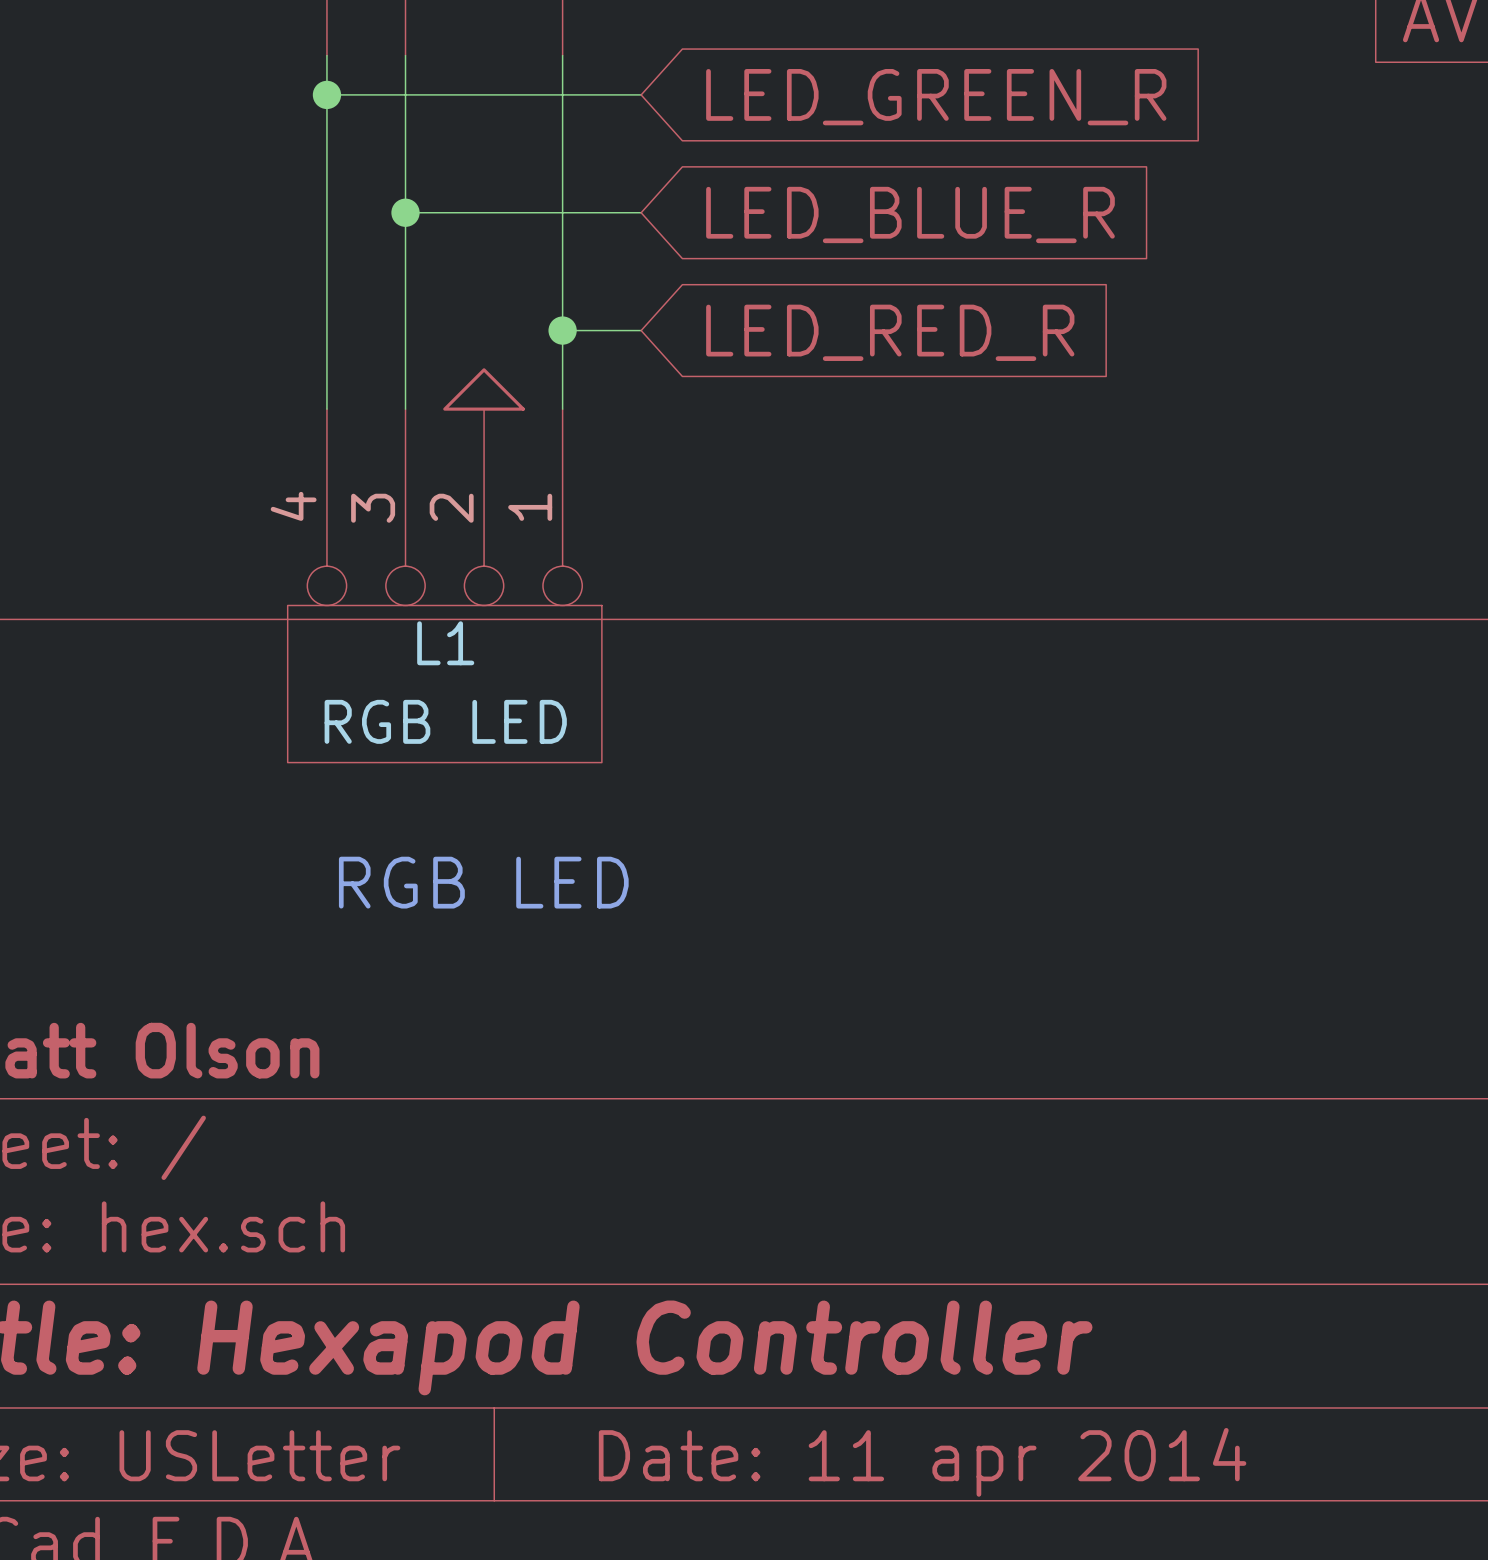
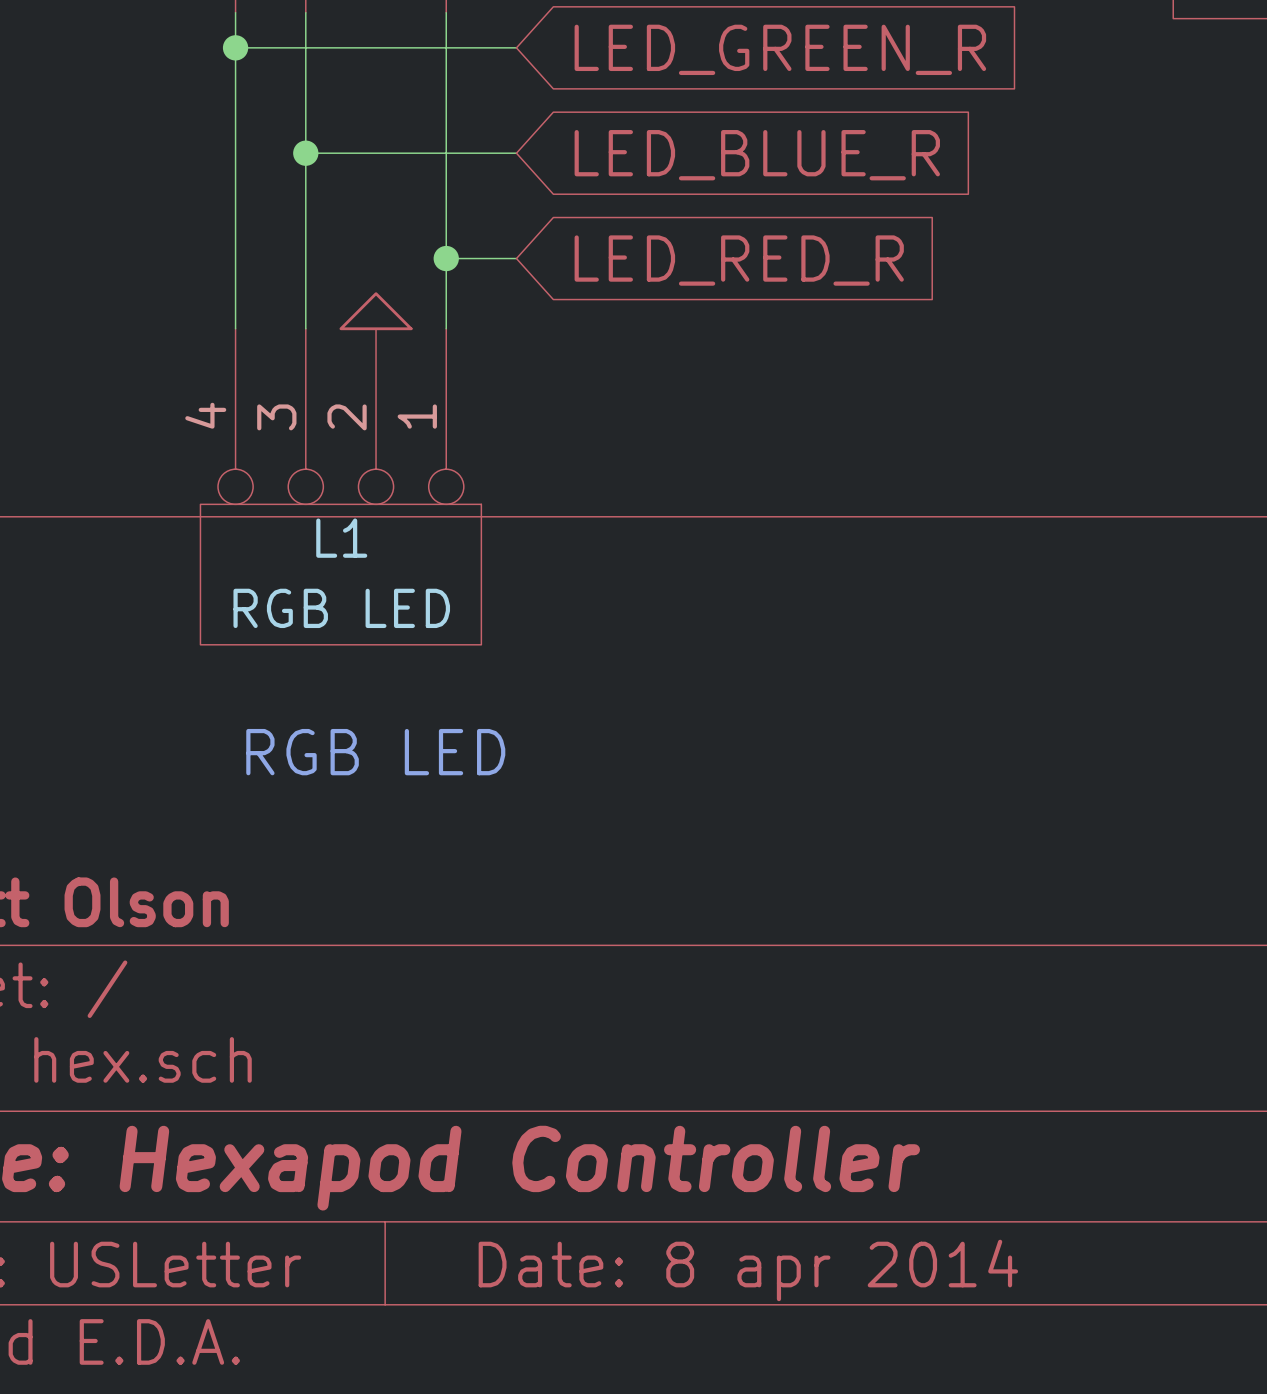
title block: Date: 11 apr 2014 (922, 1462) -> Date: 8 apr 2014 (748, 1270)

